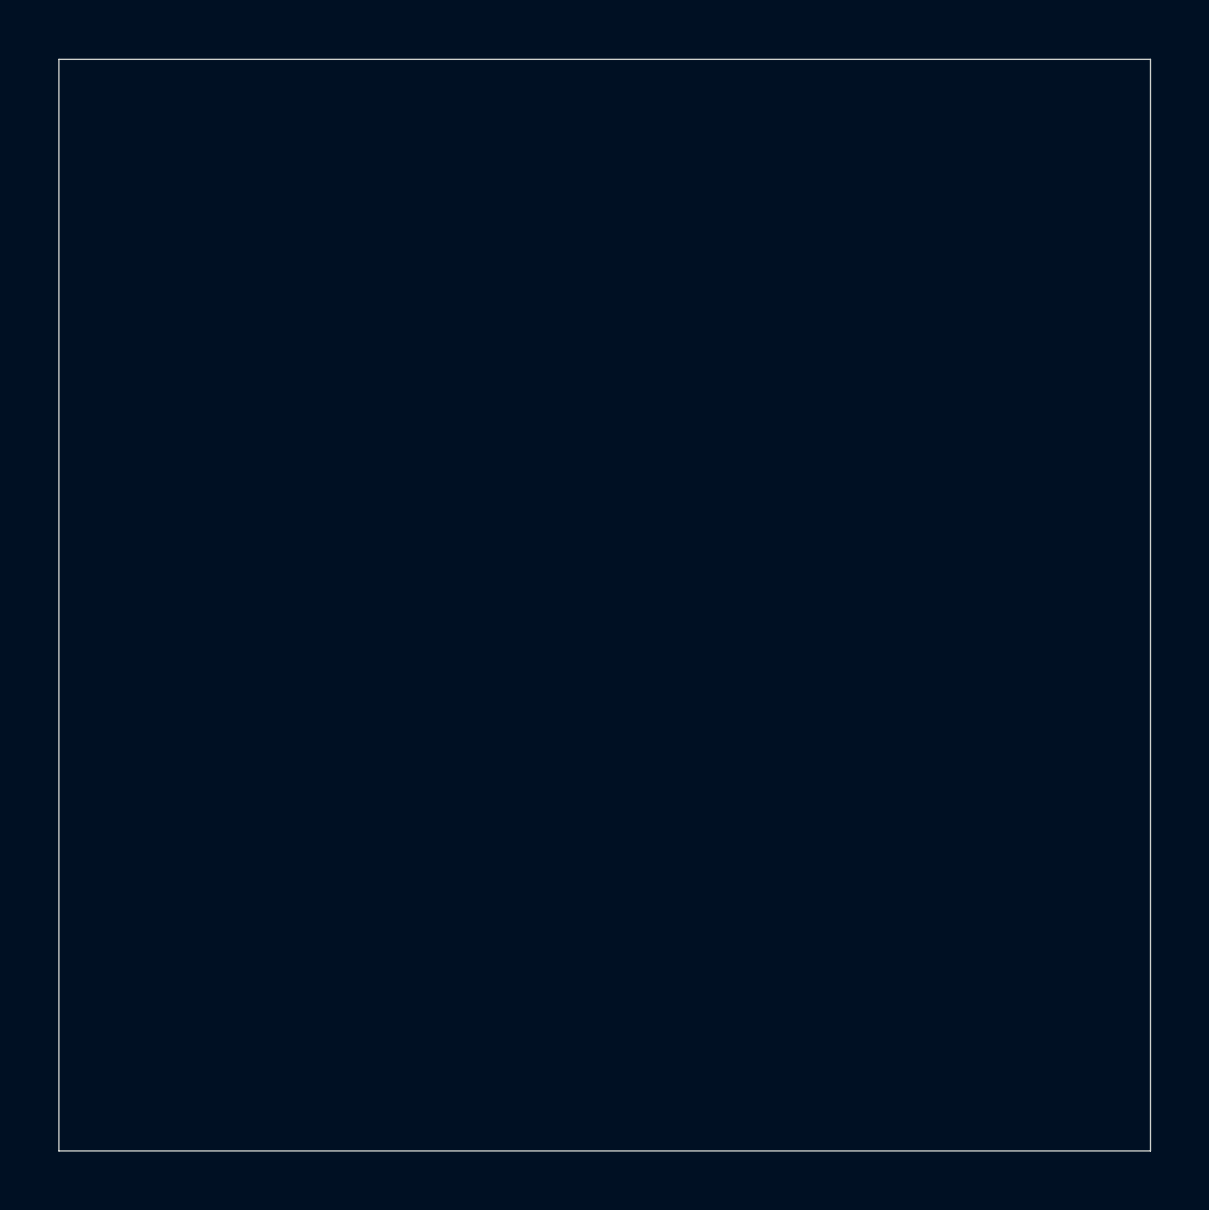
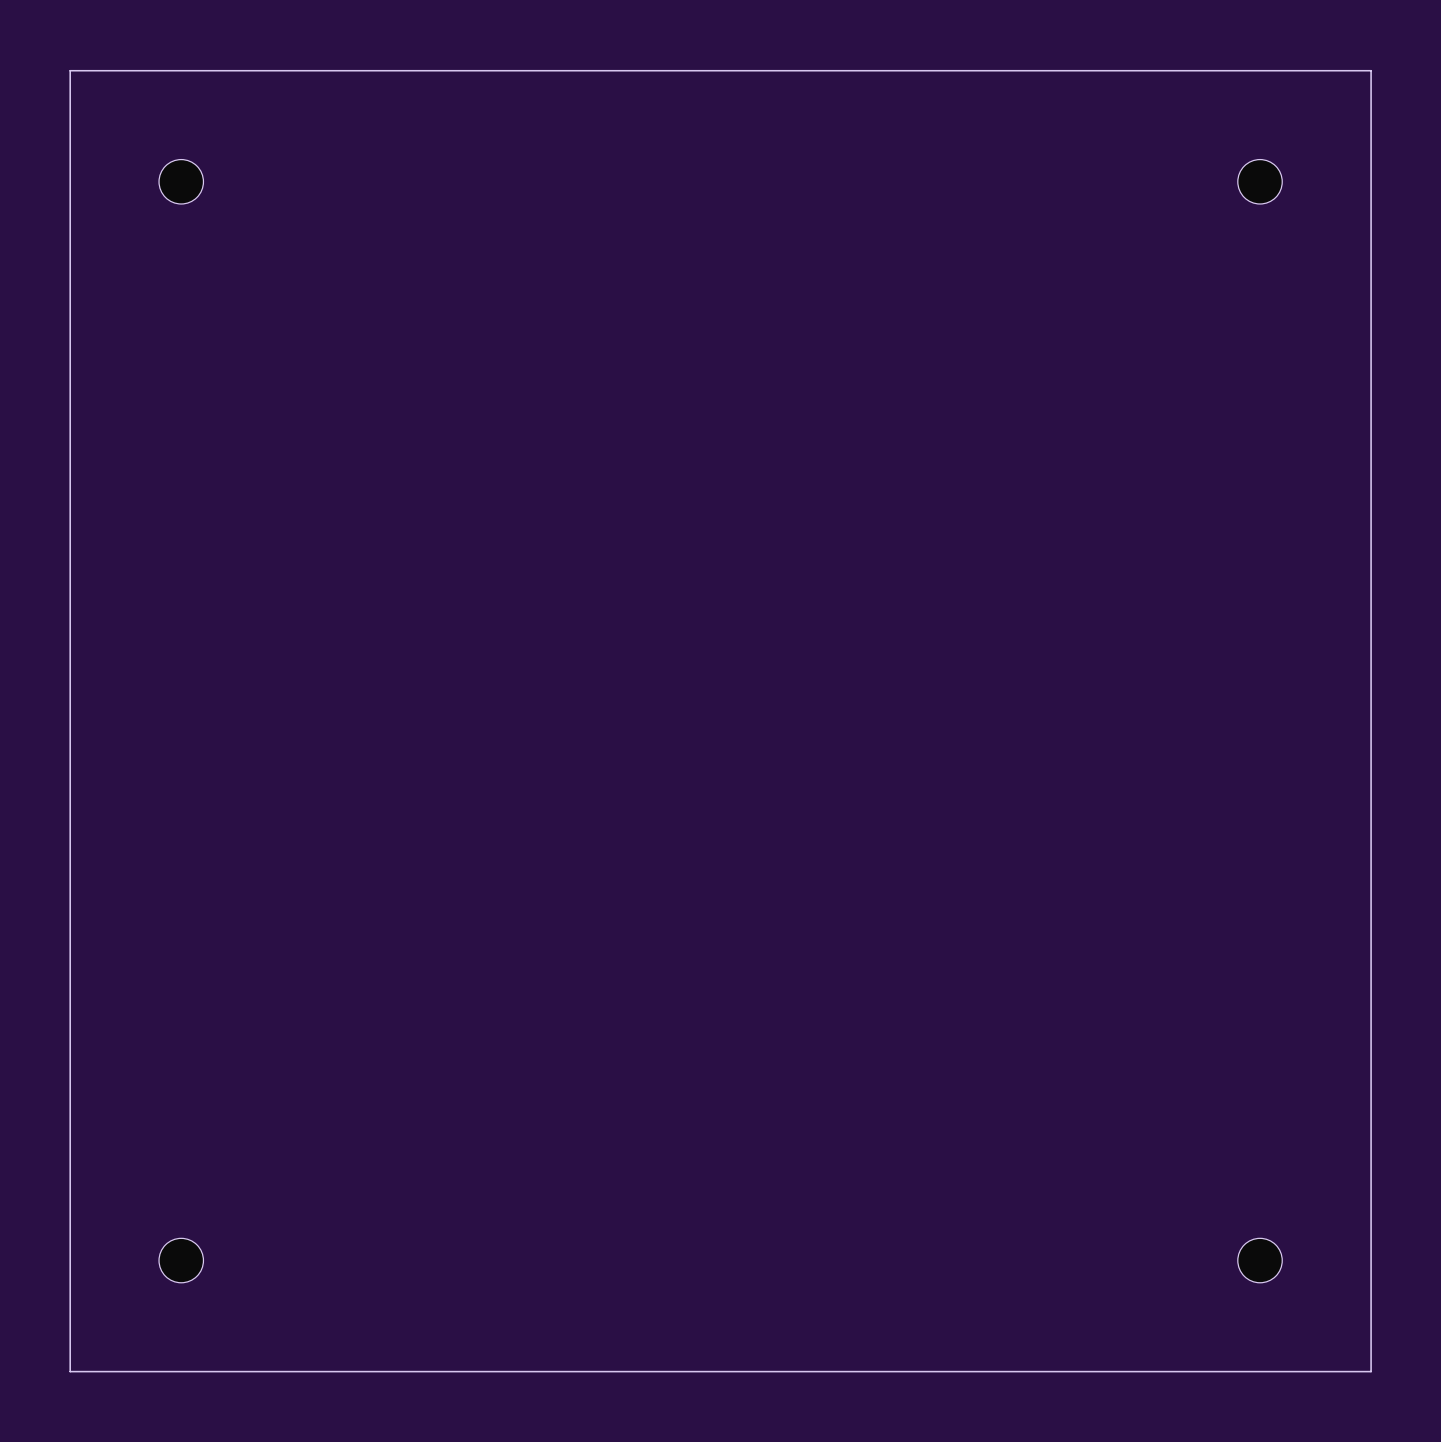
part: none -> (181, 181)
part: none -> (1260, 181)
part: none -> (181, 1260)
part: none -> (1260, 1260)

